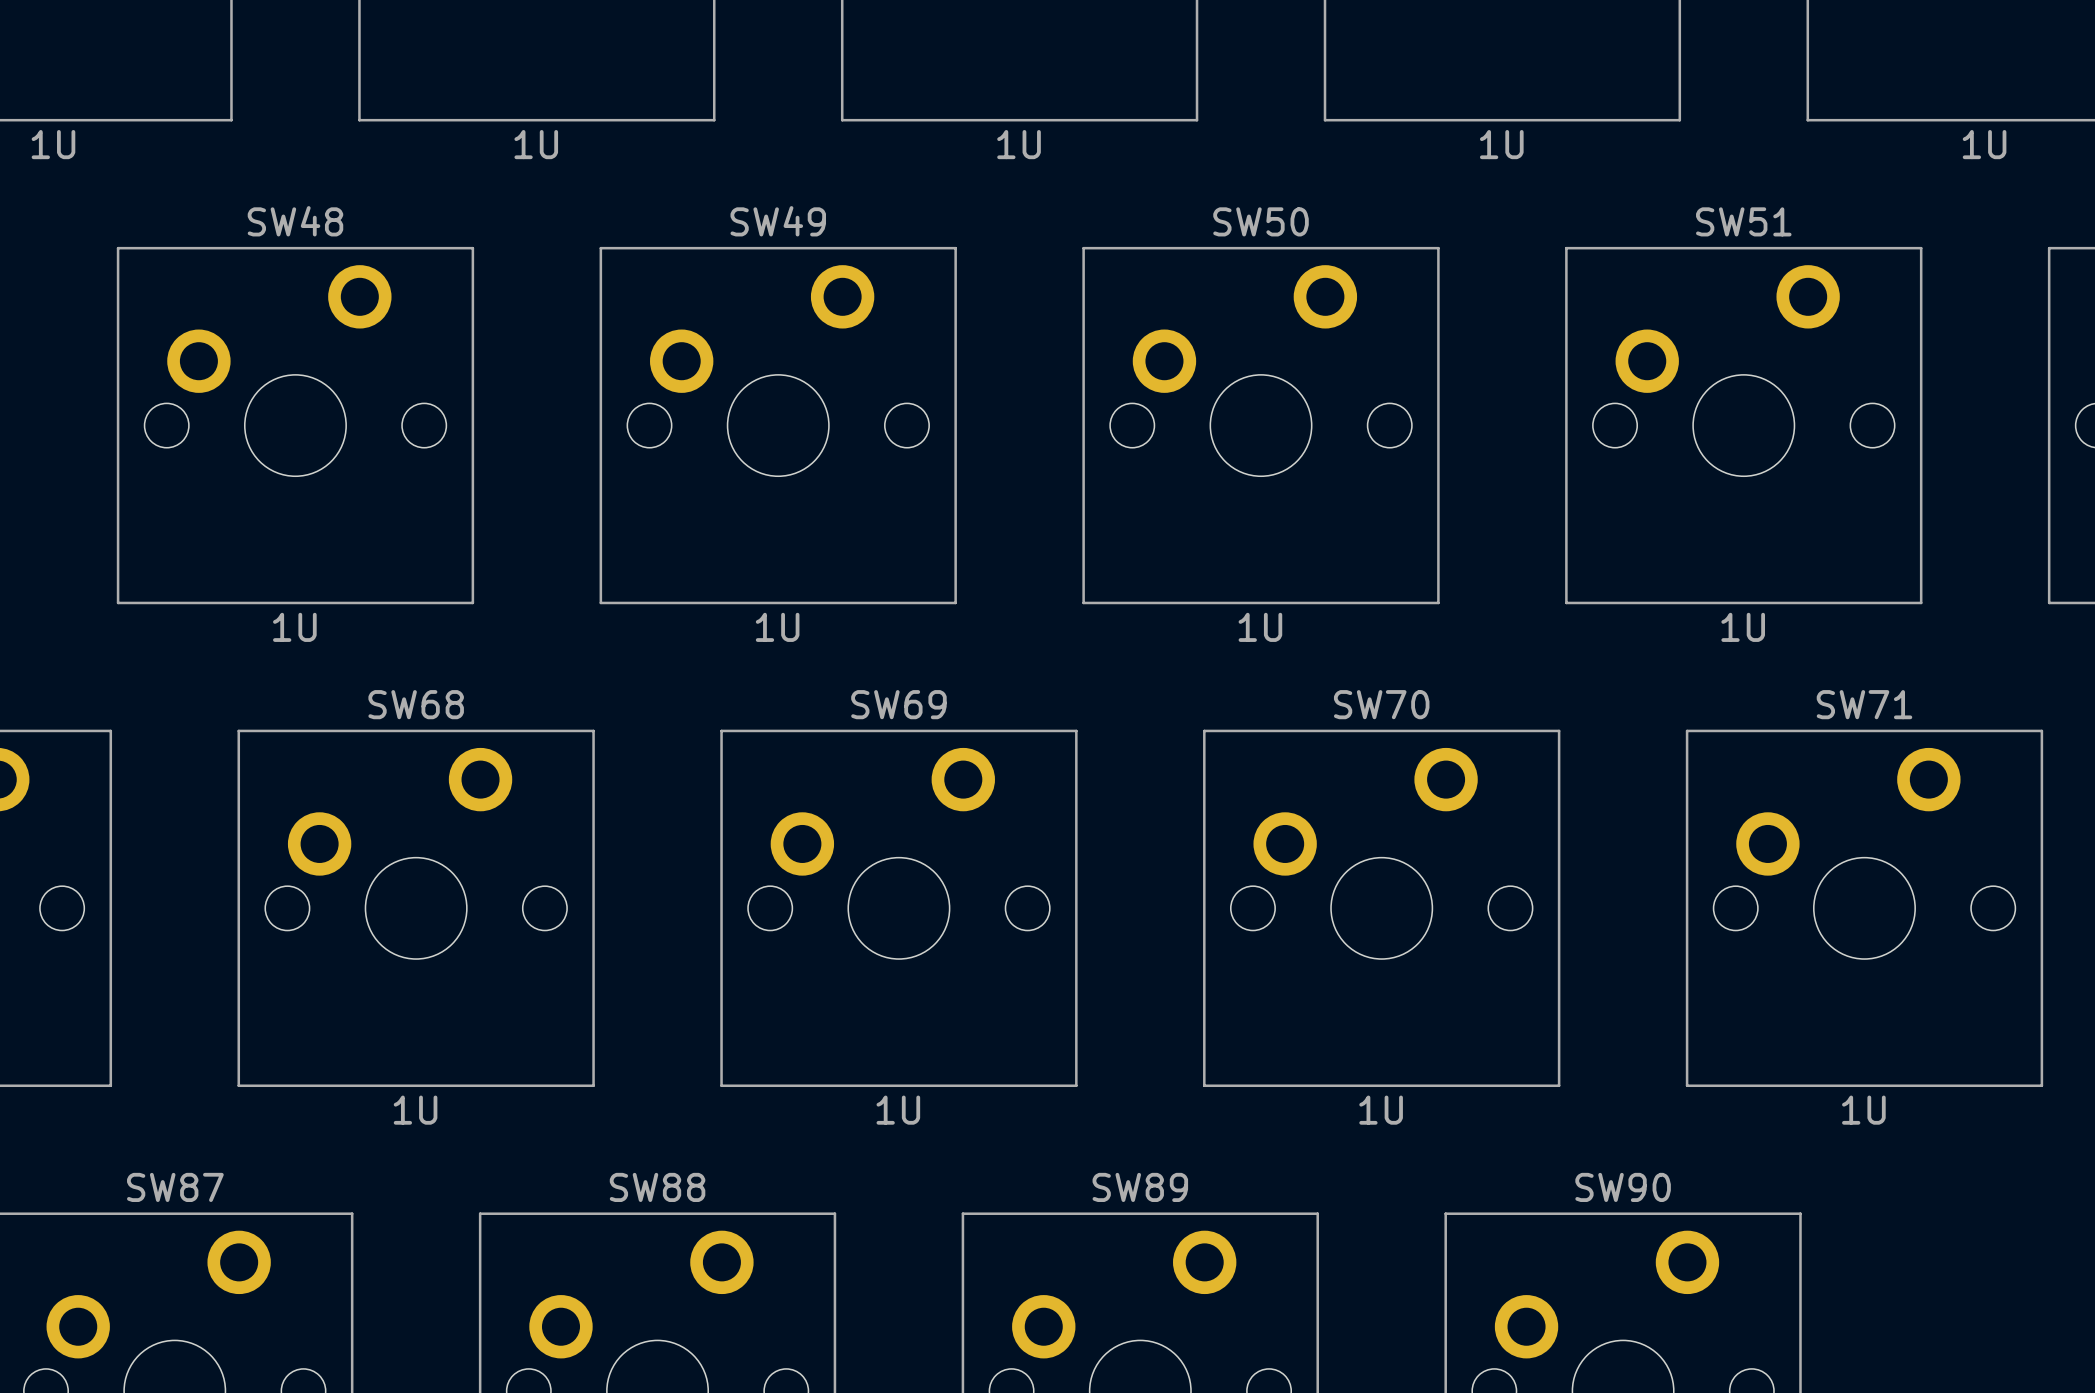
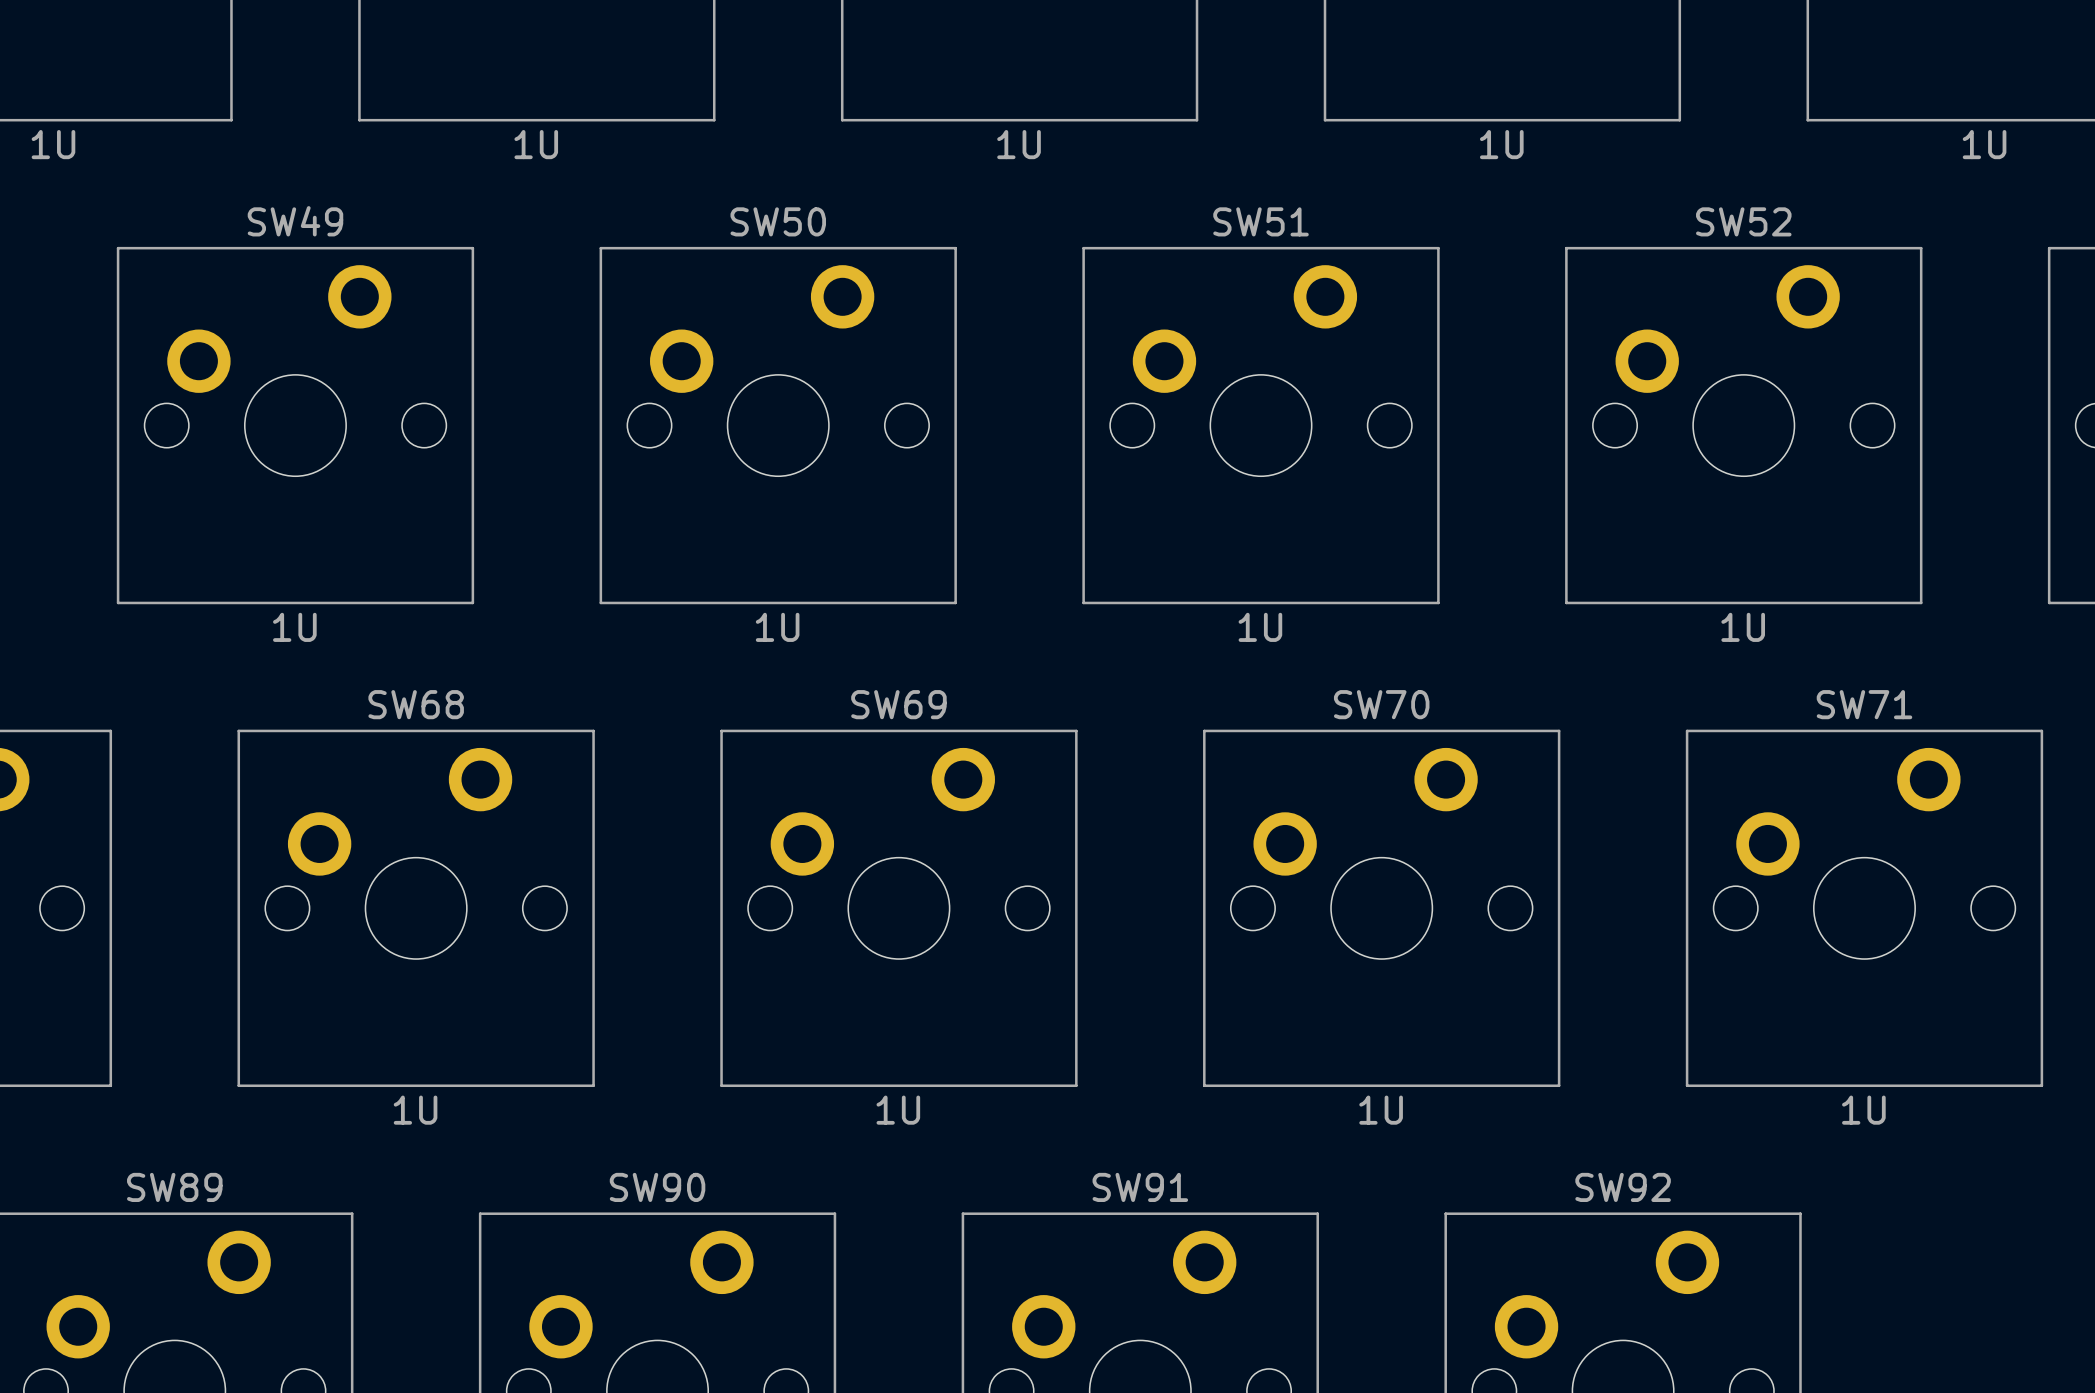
SW48 name: SW48 (295, 221) -> SW49 (295, 221)
SW49 name: SW49 (778, 221) -> SW50 (778, 221)
SW50 name: SW50 (1261, 221) -> SW51 (1261, 221)
SW51 name: SW51 (1743, 221) -> SW52 (1743, 221)
SW87 name: SW87 (175, 1187) -> SW89 (174, 1187)
SW88 name: SW88 (657, 1187) -> SW90 (657, 1187)
SW89 name: SW89 (1140, 1187) -> SW91 (1140, 1187)
SW90 name: SW90 (1623, 1187) -> SW92 (1623, 1187)

